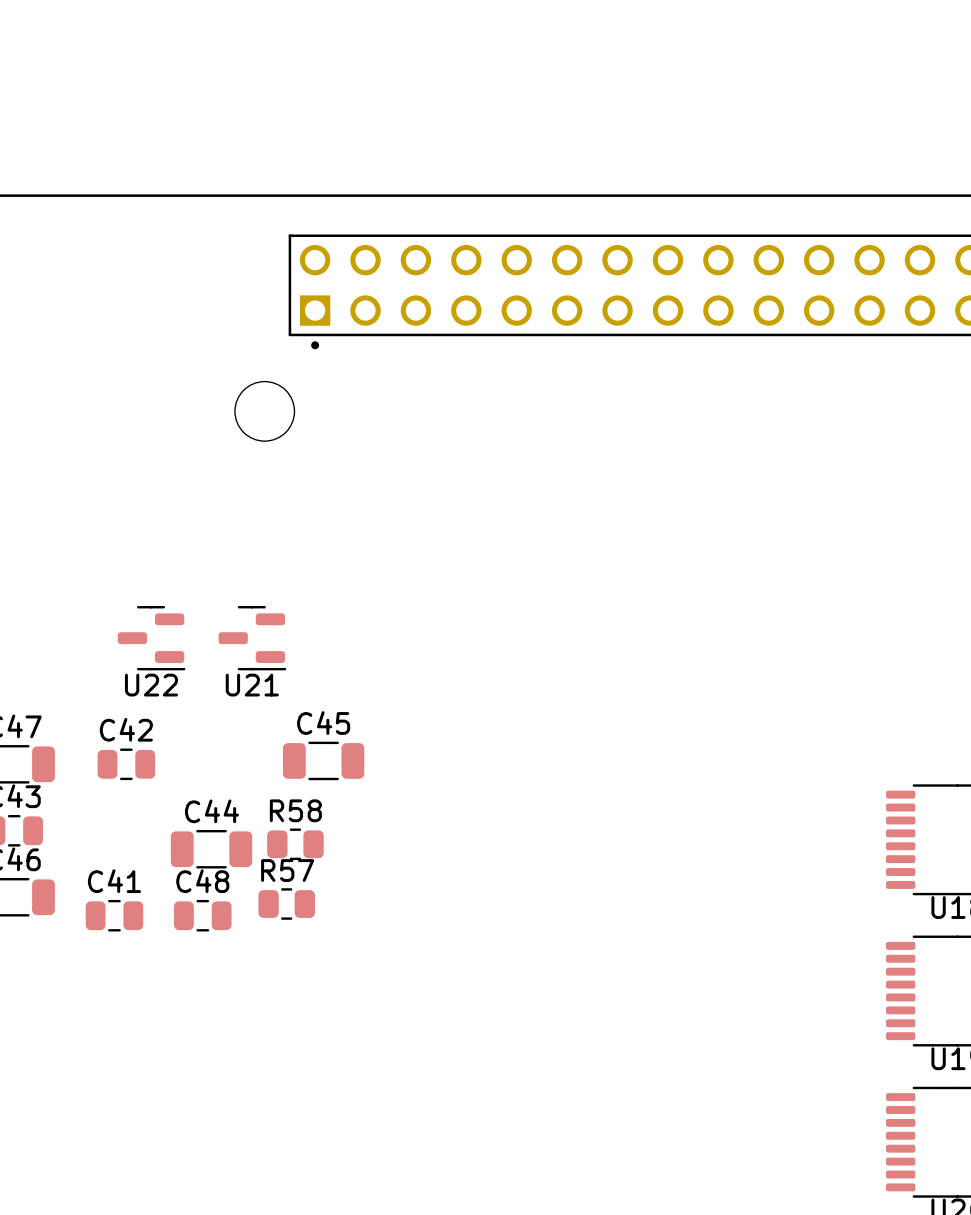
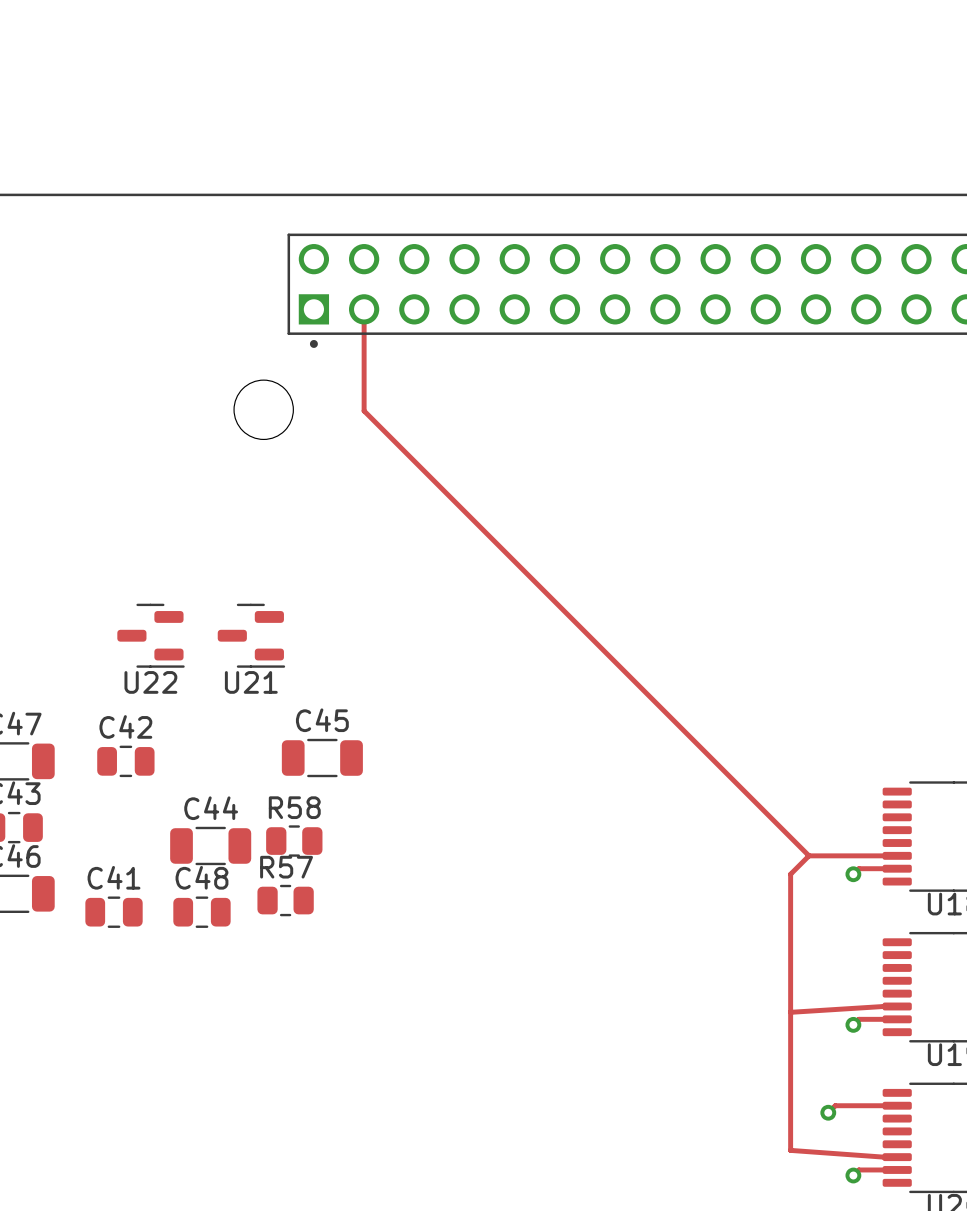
track: none -> (364, 309) (364, 410) (809, 855)
track: none -> (809, 855) (790, 874) (790, 1150) (897, 1157)
track: none -> (809, 855) (897, 855)
track: none -> (897, 868) (858, 868) (853, 874)
via: none -> (853, 874)
track: none -> (897, 1006) (790, 1012)
track: none -> (897, 1019) (858, 1019) (853, 1024)
via: none -> (853, 1024)
track: none -> (897, 1105) (835, 1105) (828, 1112)
via: none -> (828, 1112)
track: none -> (897, 1169) (858, 1169) (853, 1175)
via: none -> (853, 1175)

